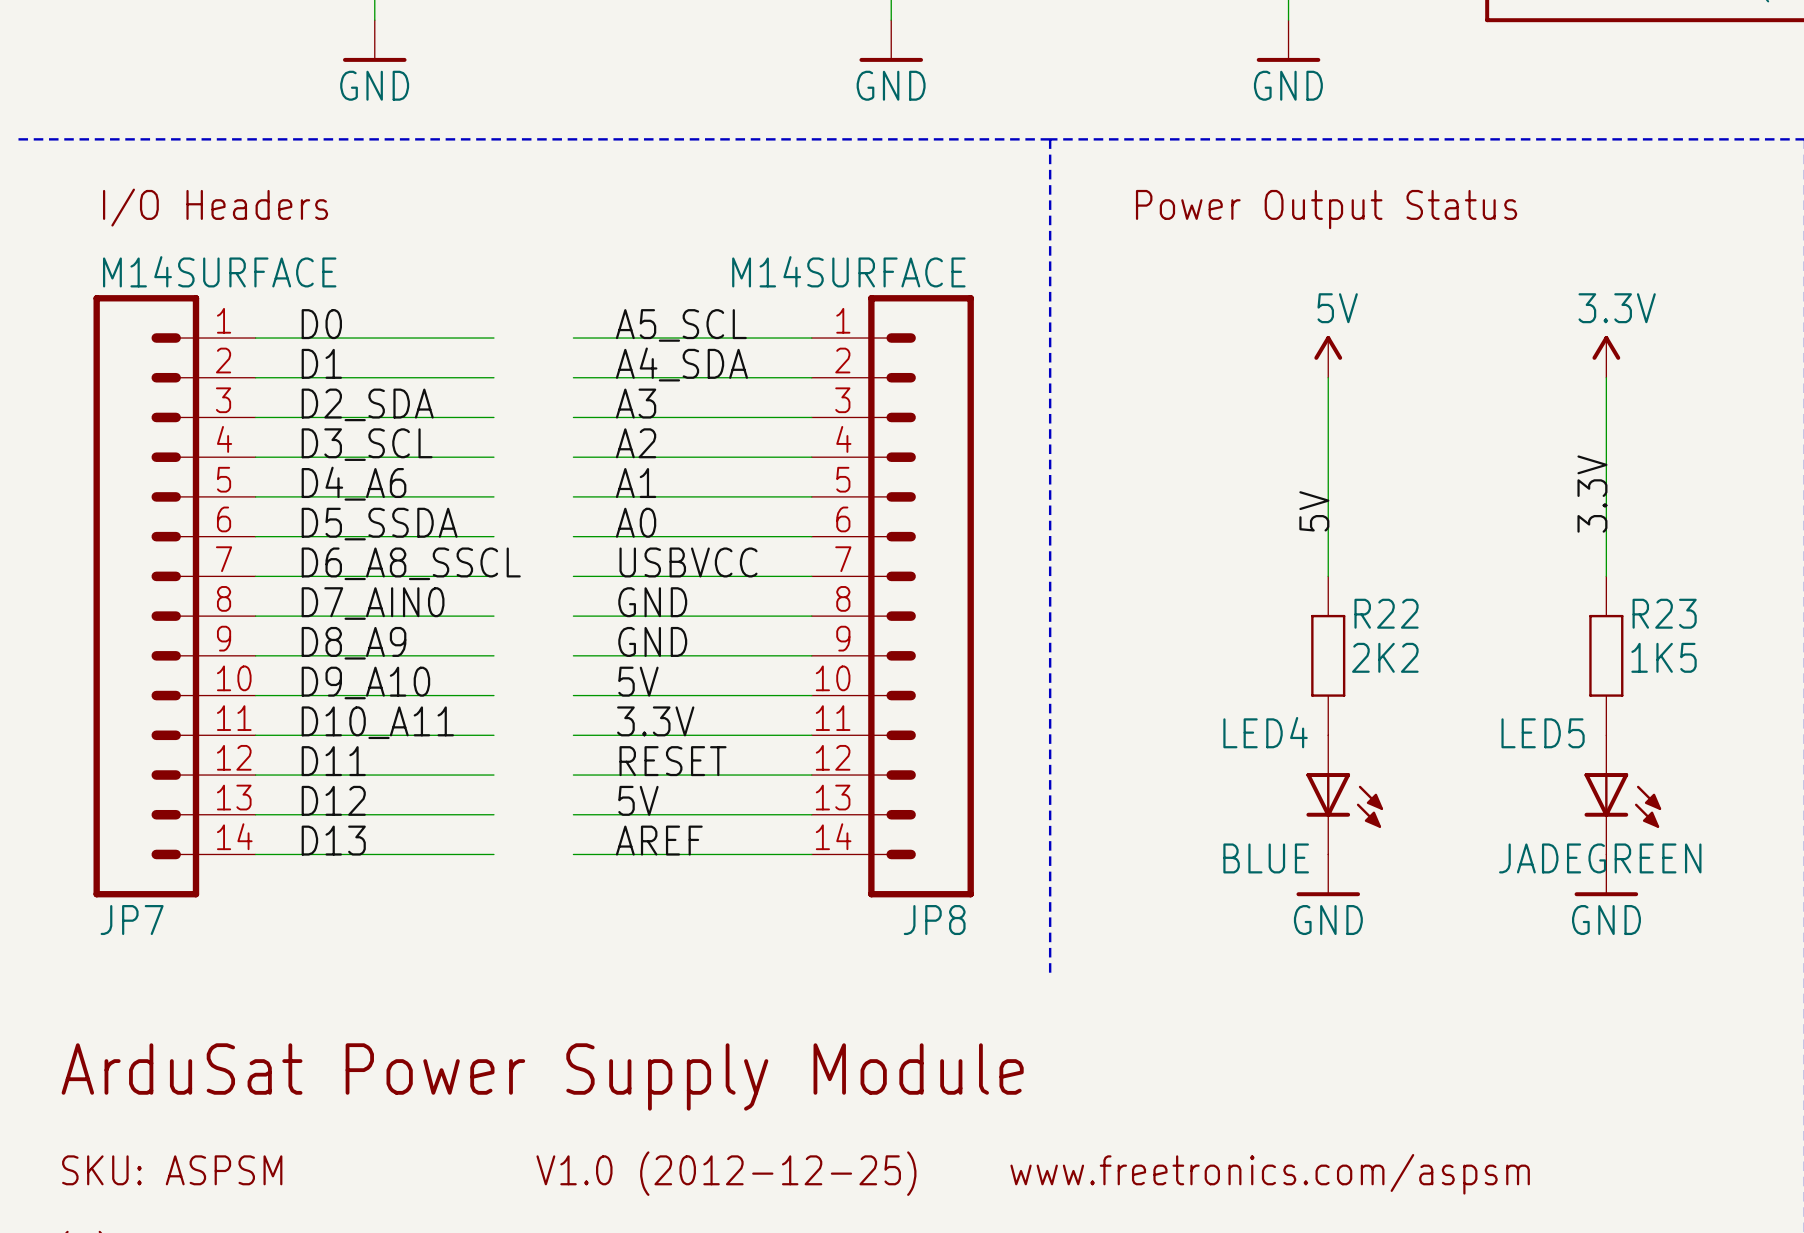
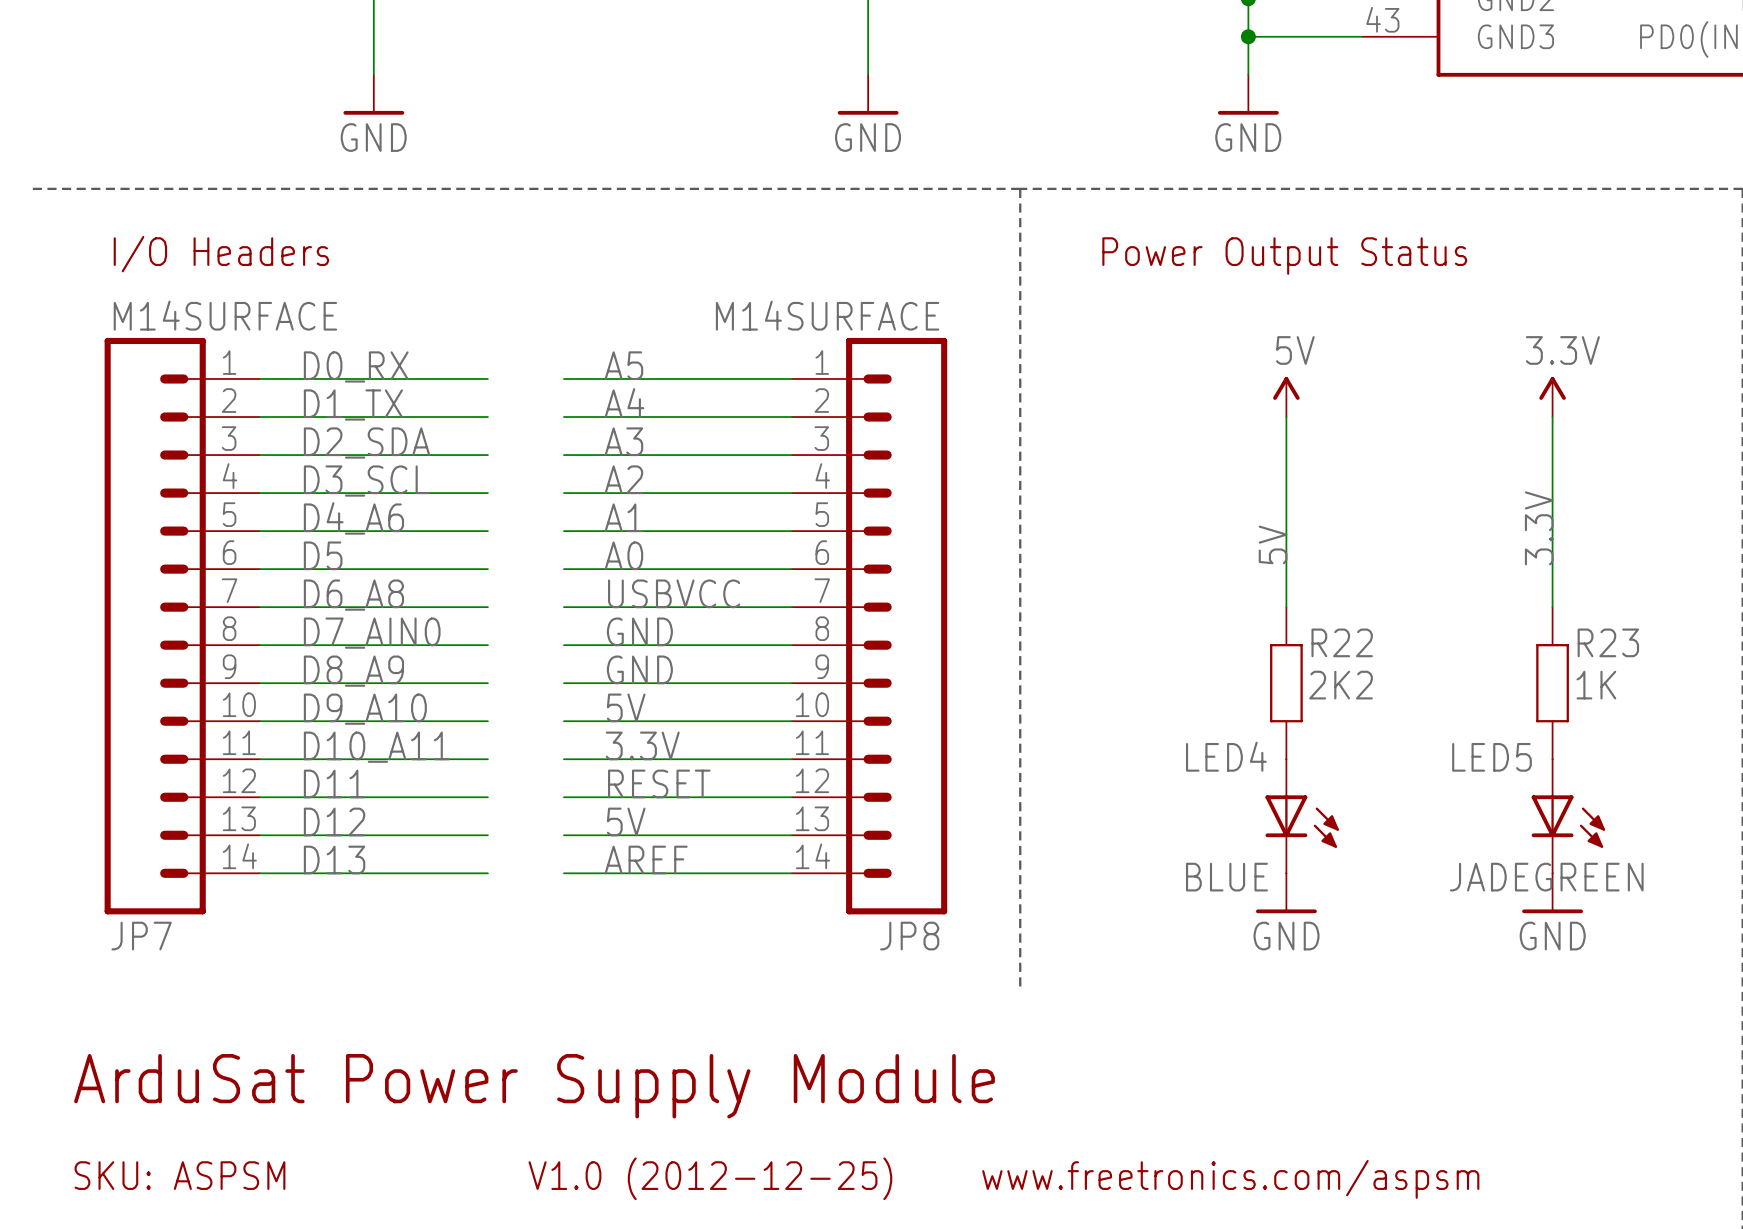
label: D0 (321, 324) -> D0_RX (356, 366)
label: A5_SCL (681, 325) -> A5 (623, 365)
label: D1 (321, 363) -> D1_TX (353, 404)
label: A4_SDA (681, 364) -> A4 (624, 403)
label: D5_SSDA (379, 524) -> D5 (323, 555)
label: D6_A8_SSCL (411, 563) -> D6_A8 (353, 595)
R23 value: 1K5 (1664, 657) -> 1K (1596, 685)

